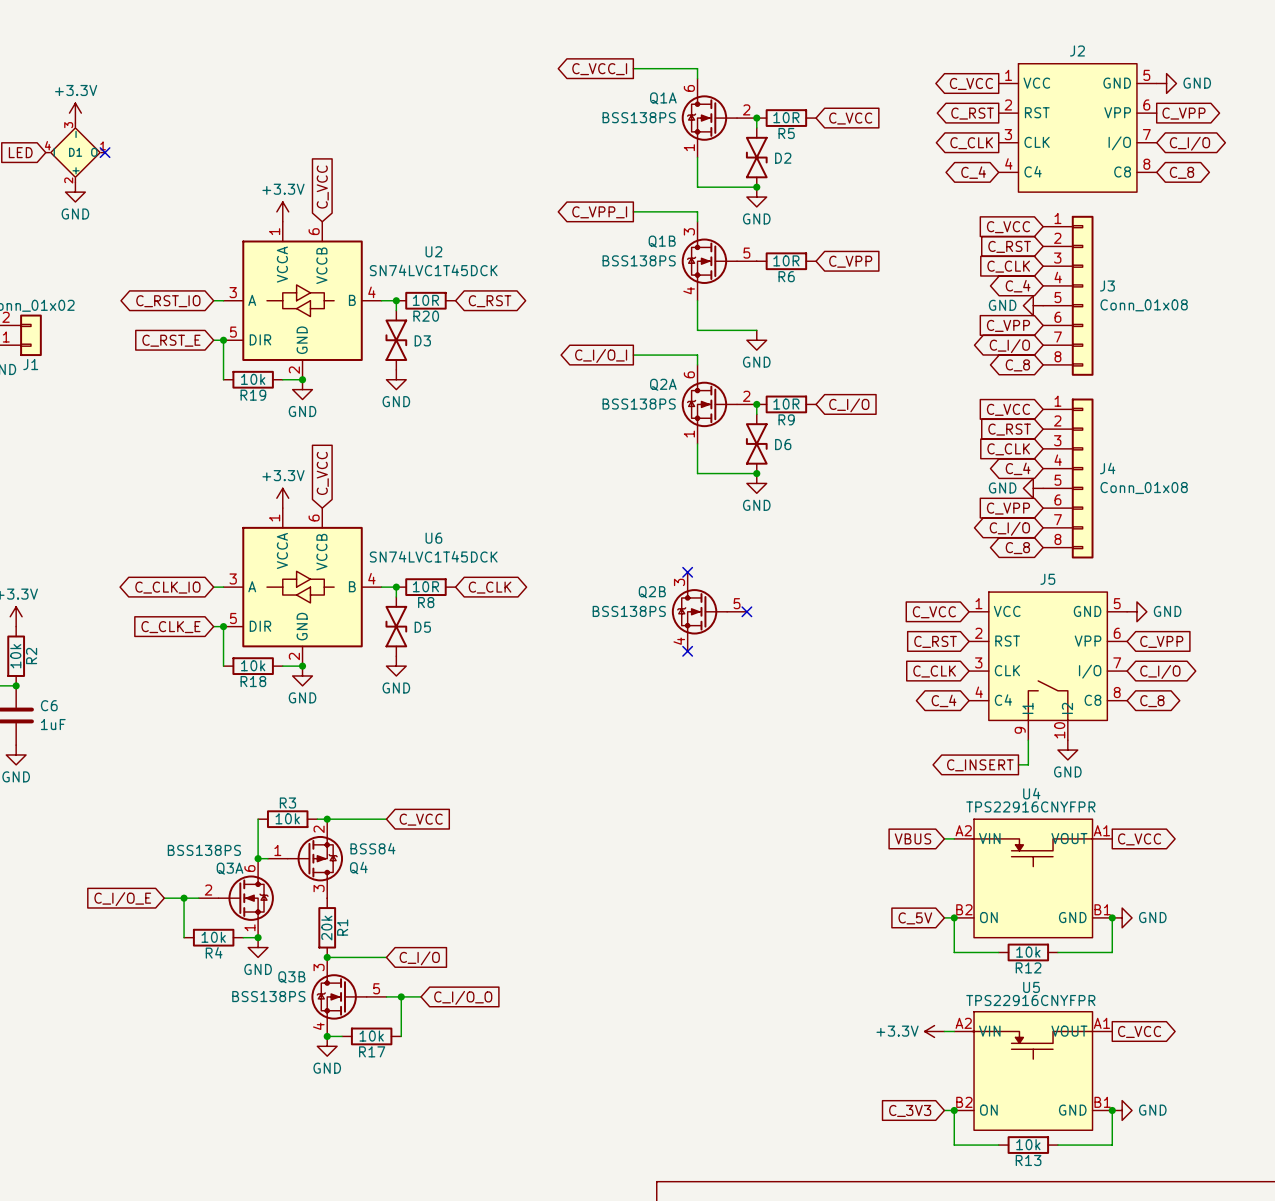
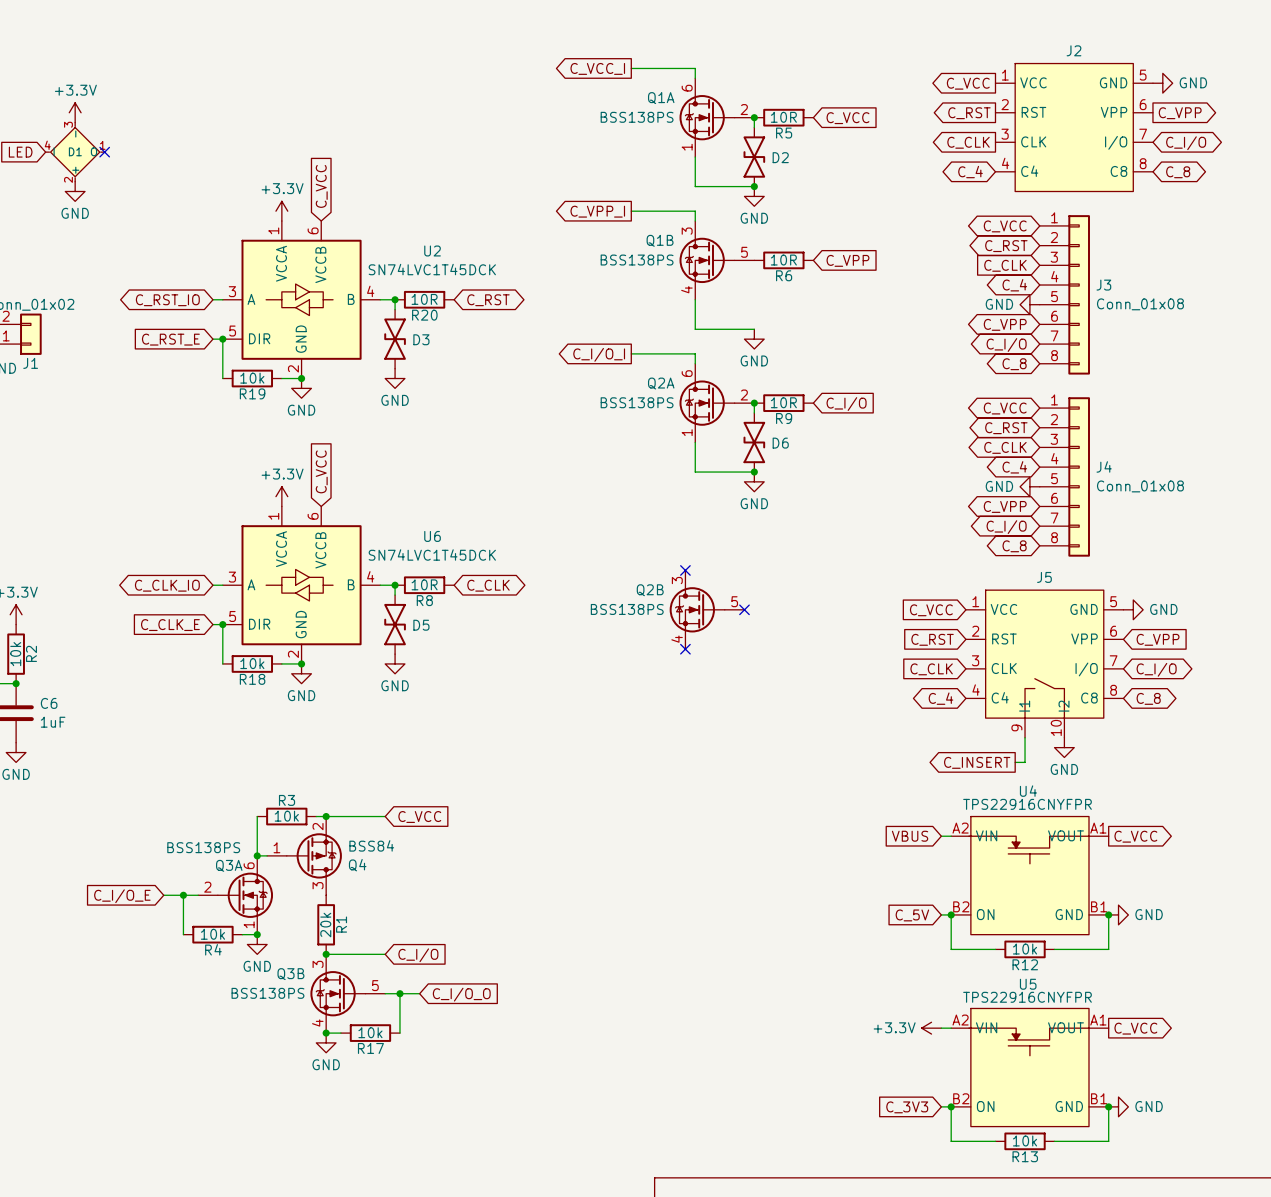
global label shape: input (1008, 227) -> bidirectional (1005, 226)
global label shape: input (1009, 246) -> bidirectional (1006, 246)
global label shape: input (1008, 325) -> bidirectional (1005, 324)
global label shape: input (1008, 409) -> bidirectional (1005, 408)
global label shape: input (1009, 429) -> bidirectional (1006, 428)
global label shape: input (1008, 449) -> bidirectional (1005, 447)
global label shape: input (1008, 508) -> bidirectional (1005, 506)

